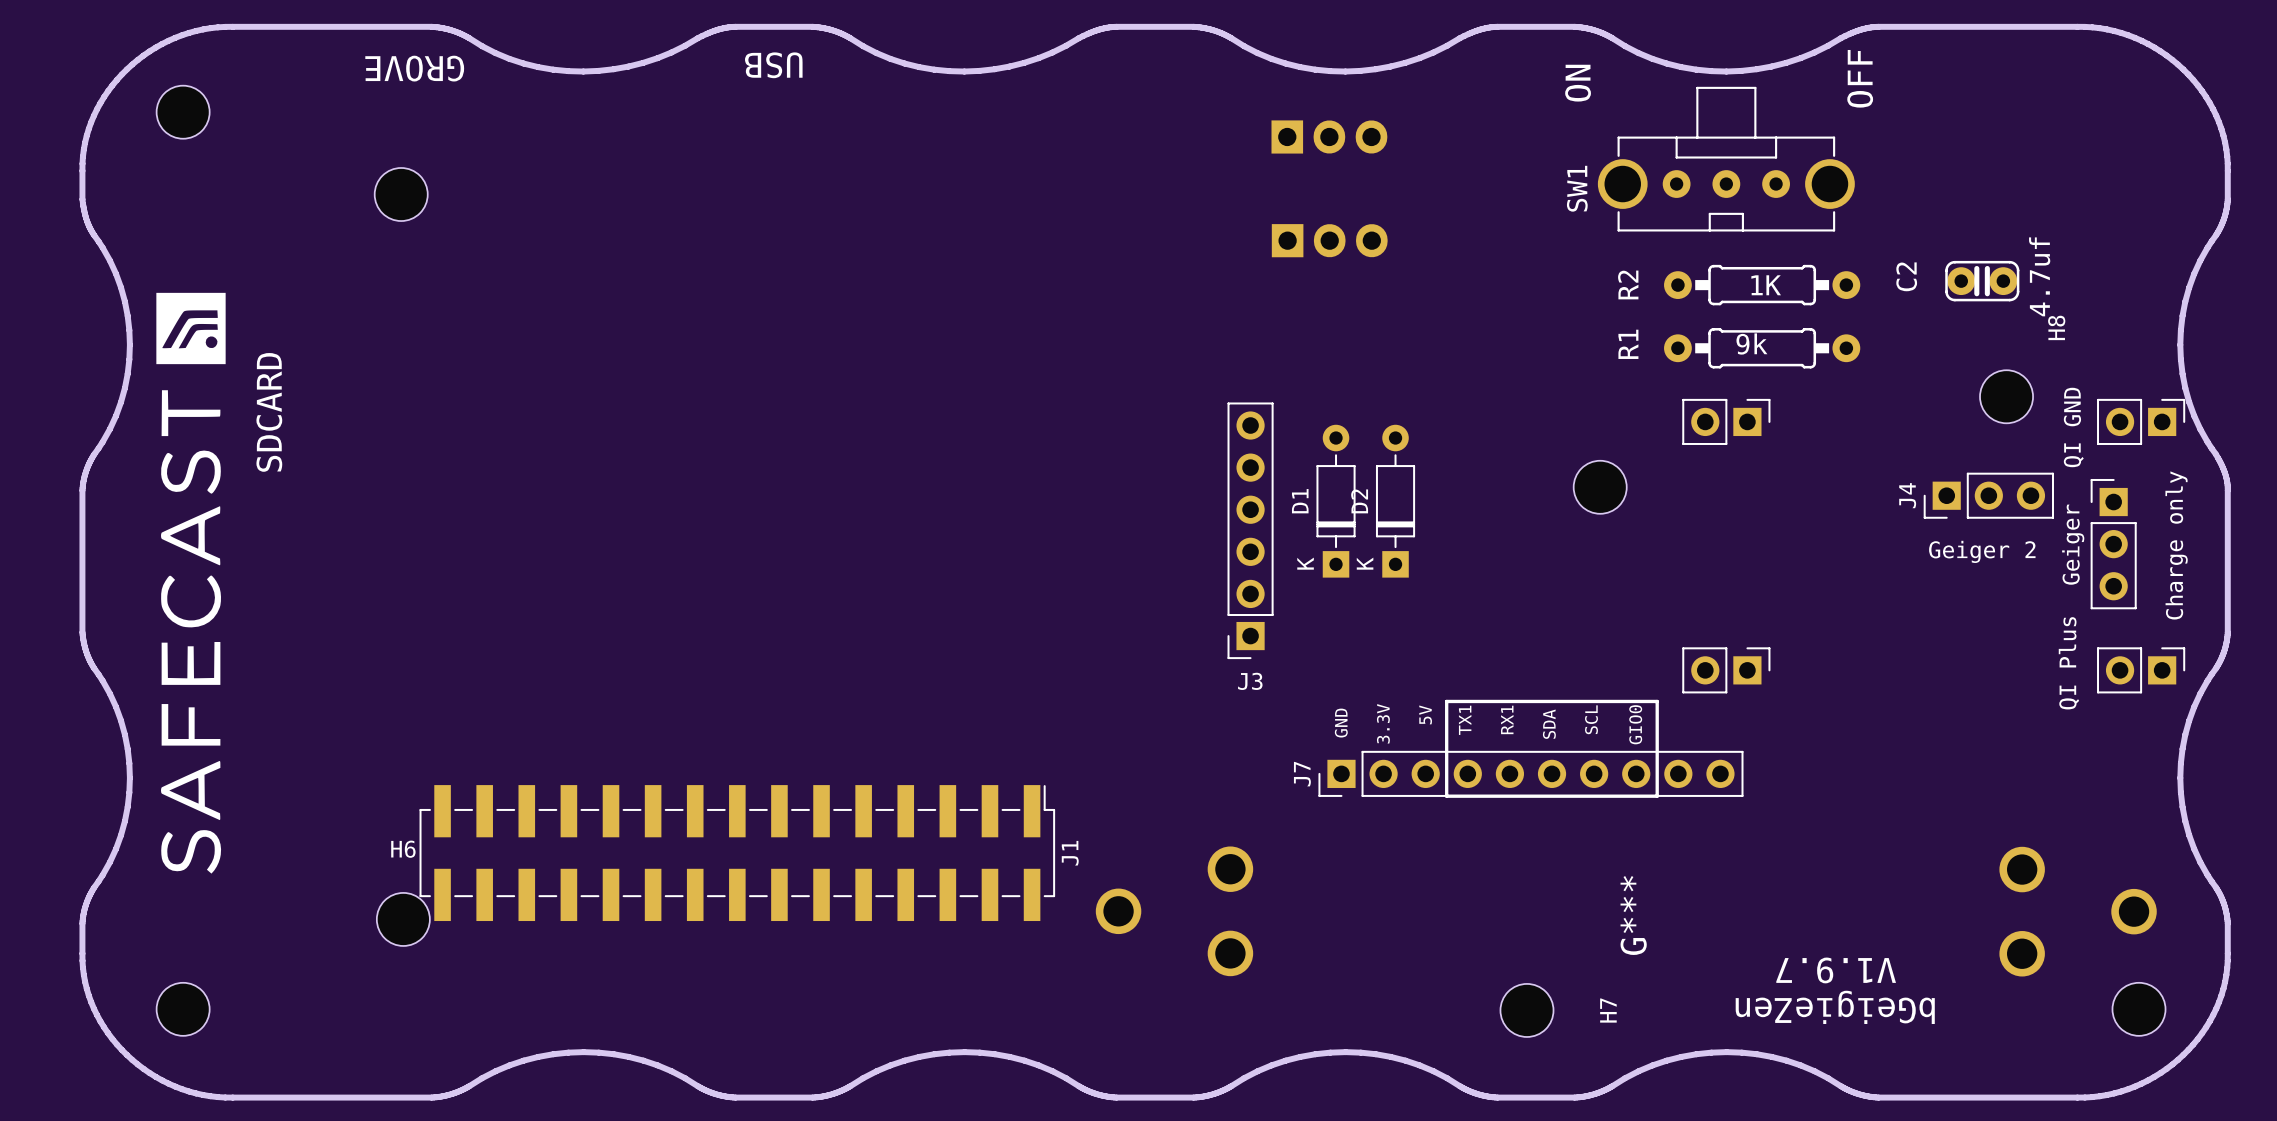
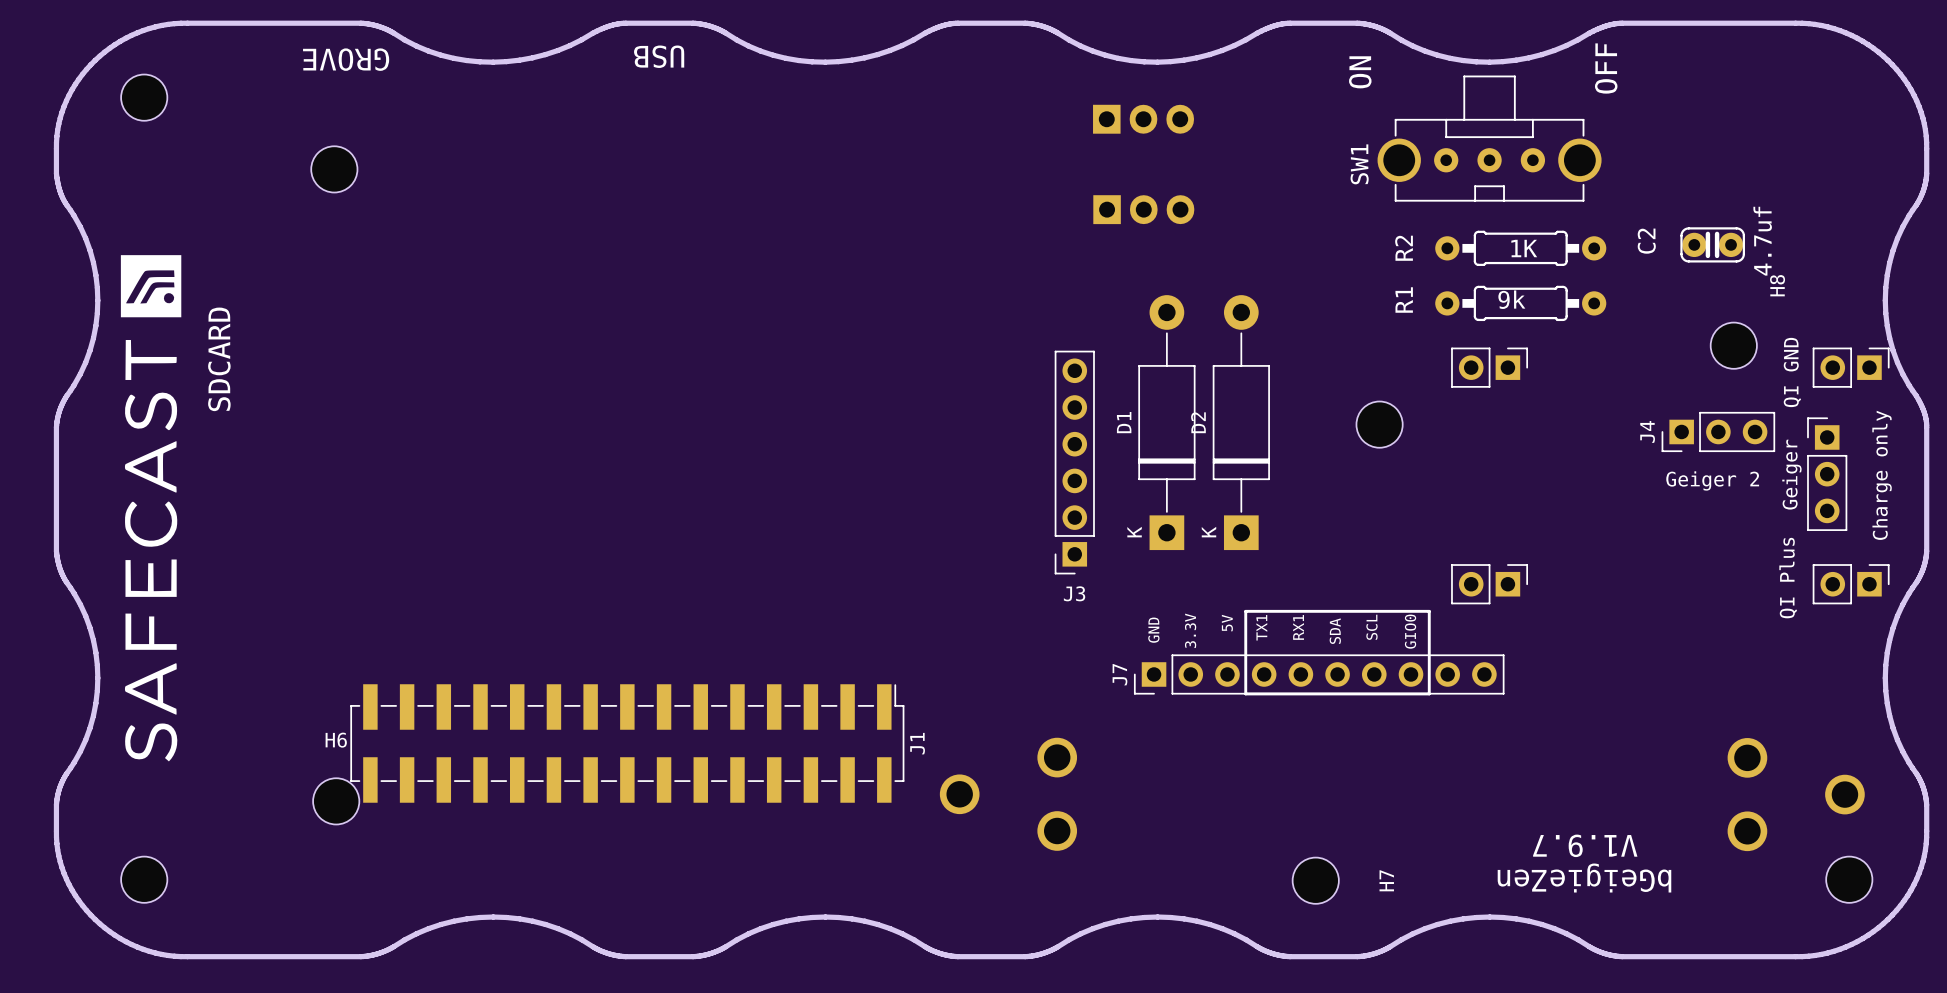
D1 footprint: [1316, 424, 1356, 578] -> [1138, 295, 1196, 551]
D2 footprint: [1375, 424, 1416, 578] -> [1212, 295, 1270, 551]
G***: (1633, 915) -> none

